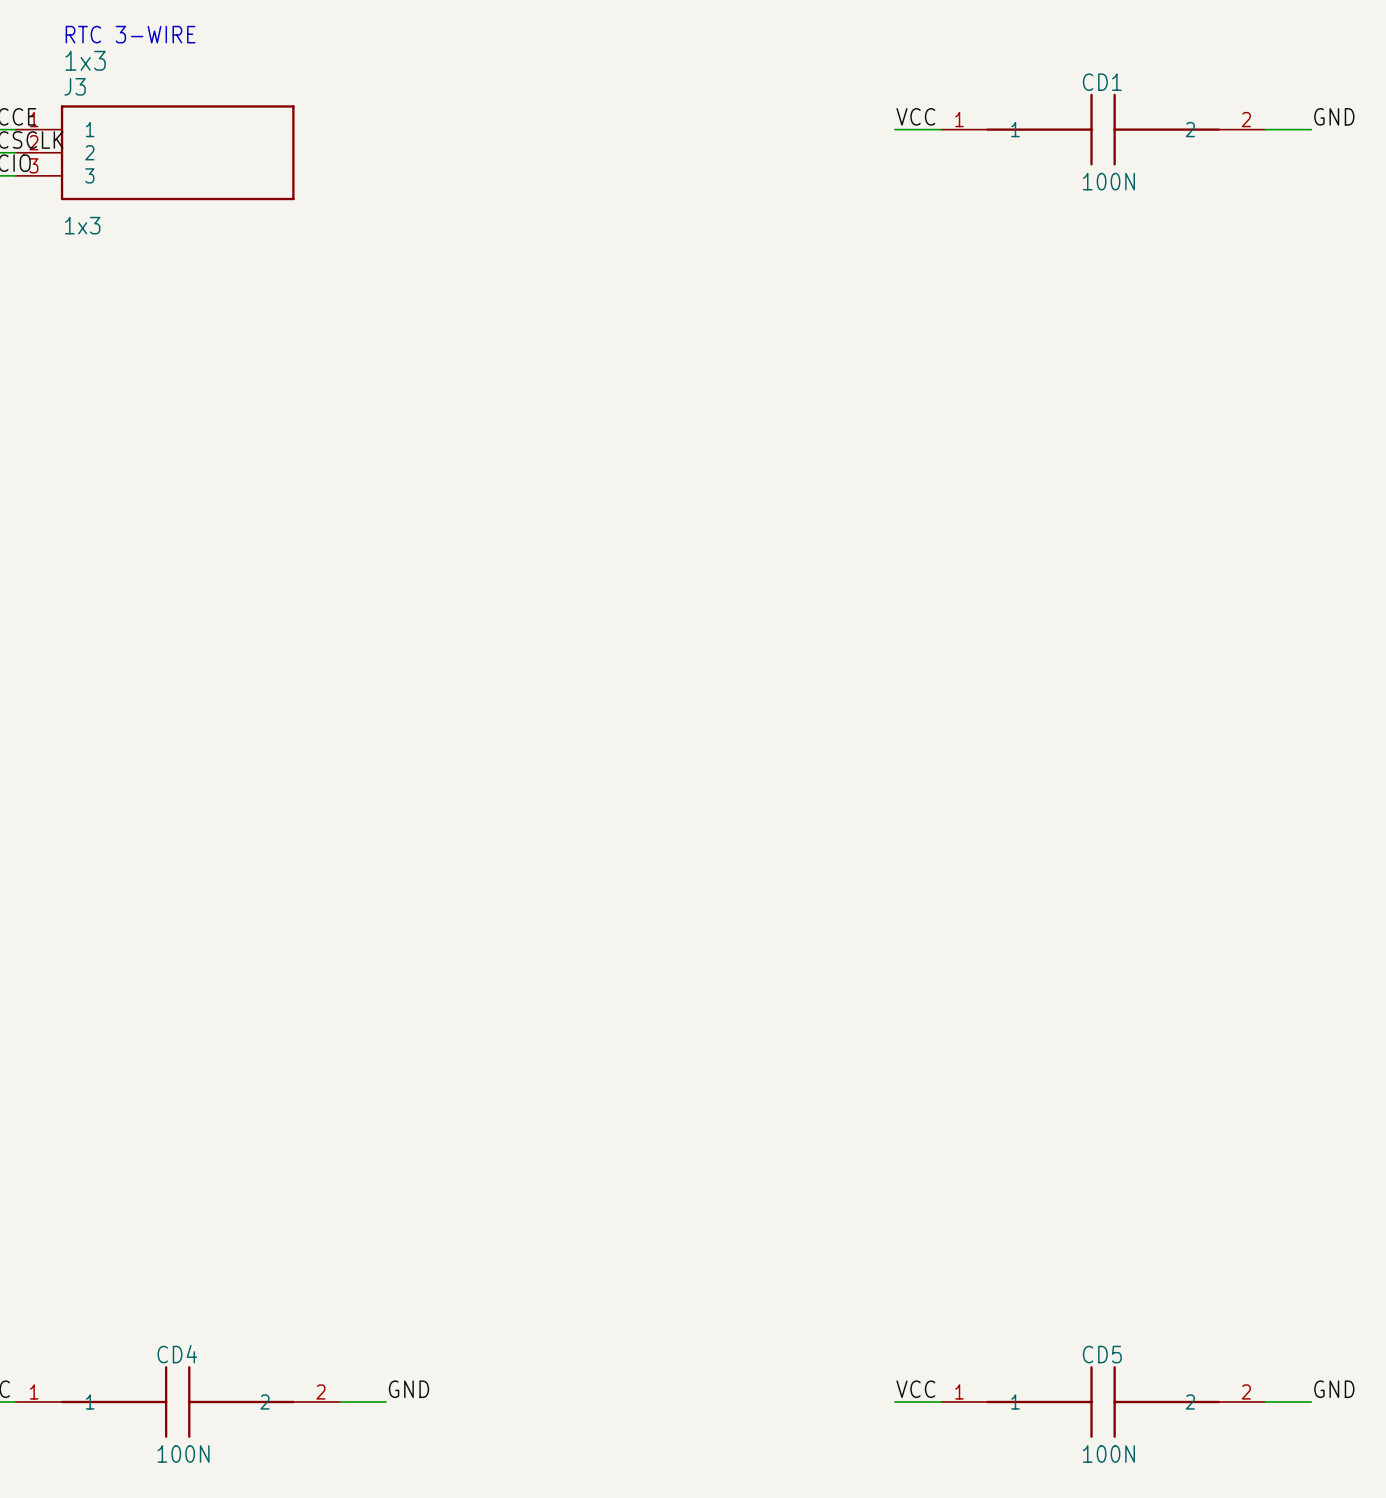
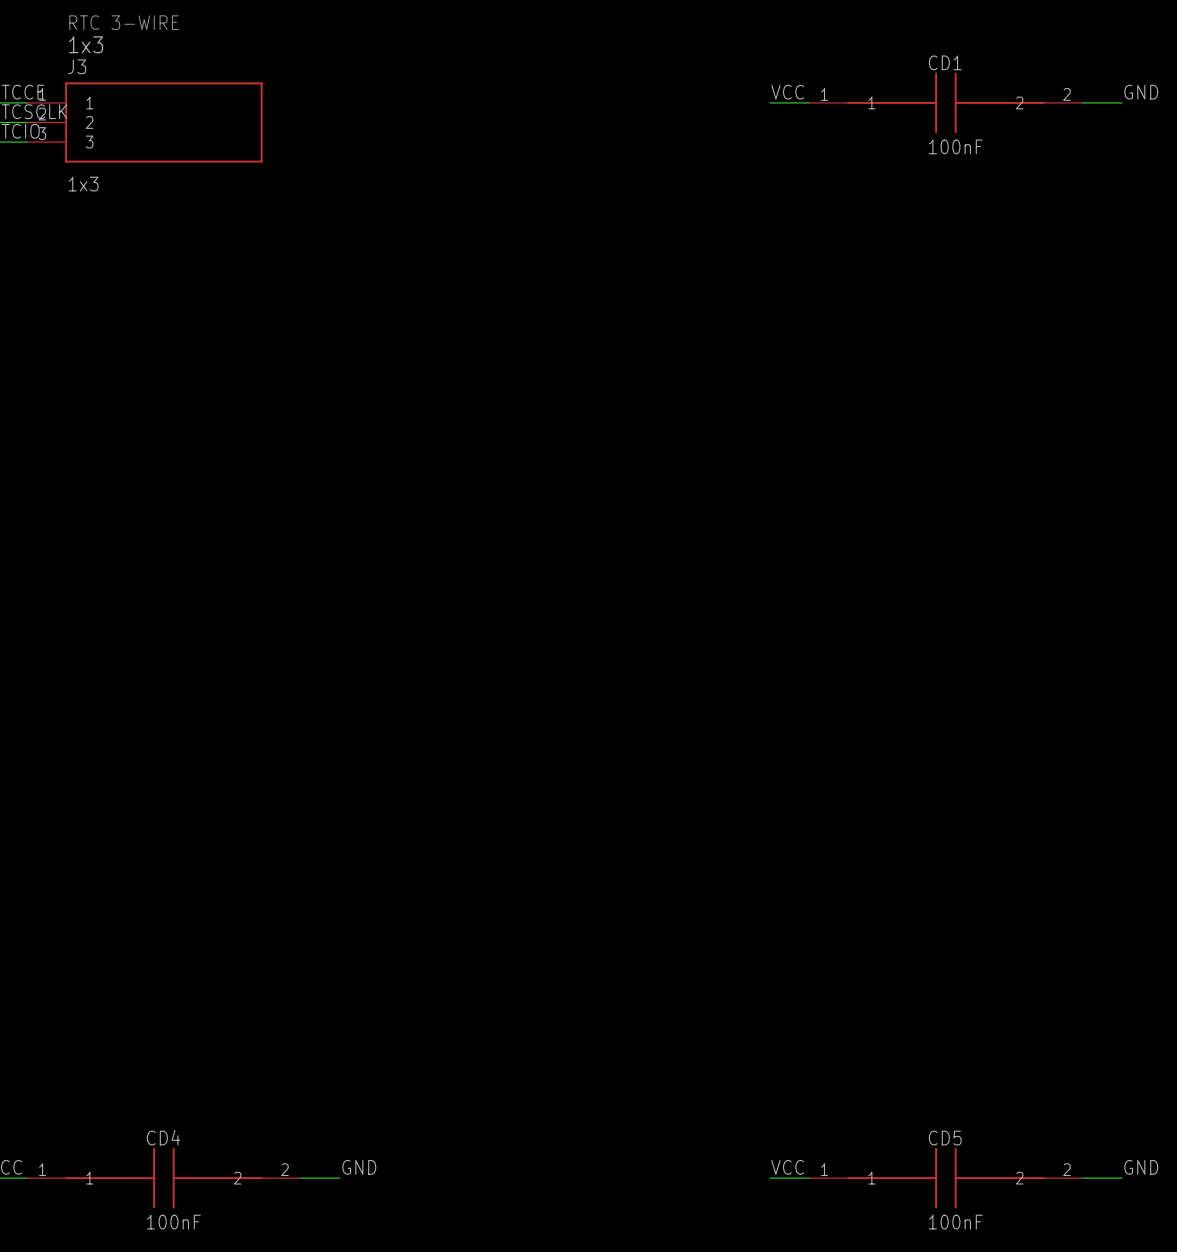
CD1 value: 100N (1108, 181) -> 100nF (955, 146)
CD4 value: 100N (183, 1454) -> 100nF (173, 1222)
CD5 value: 100N (1108, 1454) -> 100nF (955, 1222)

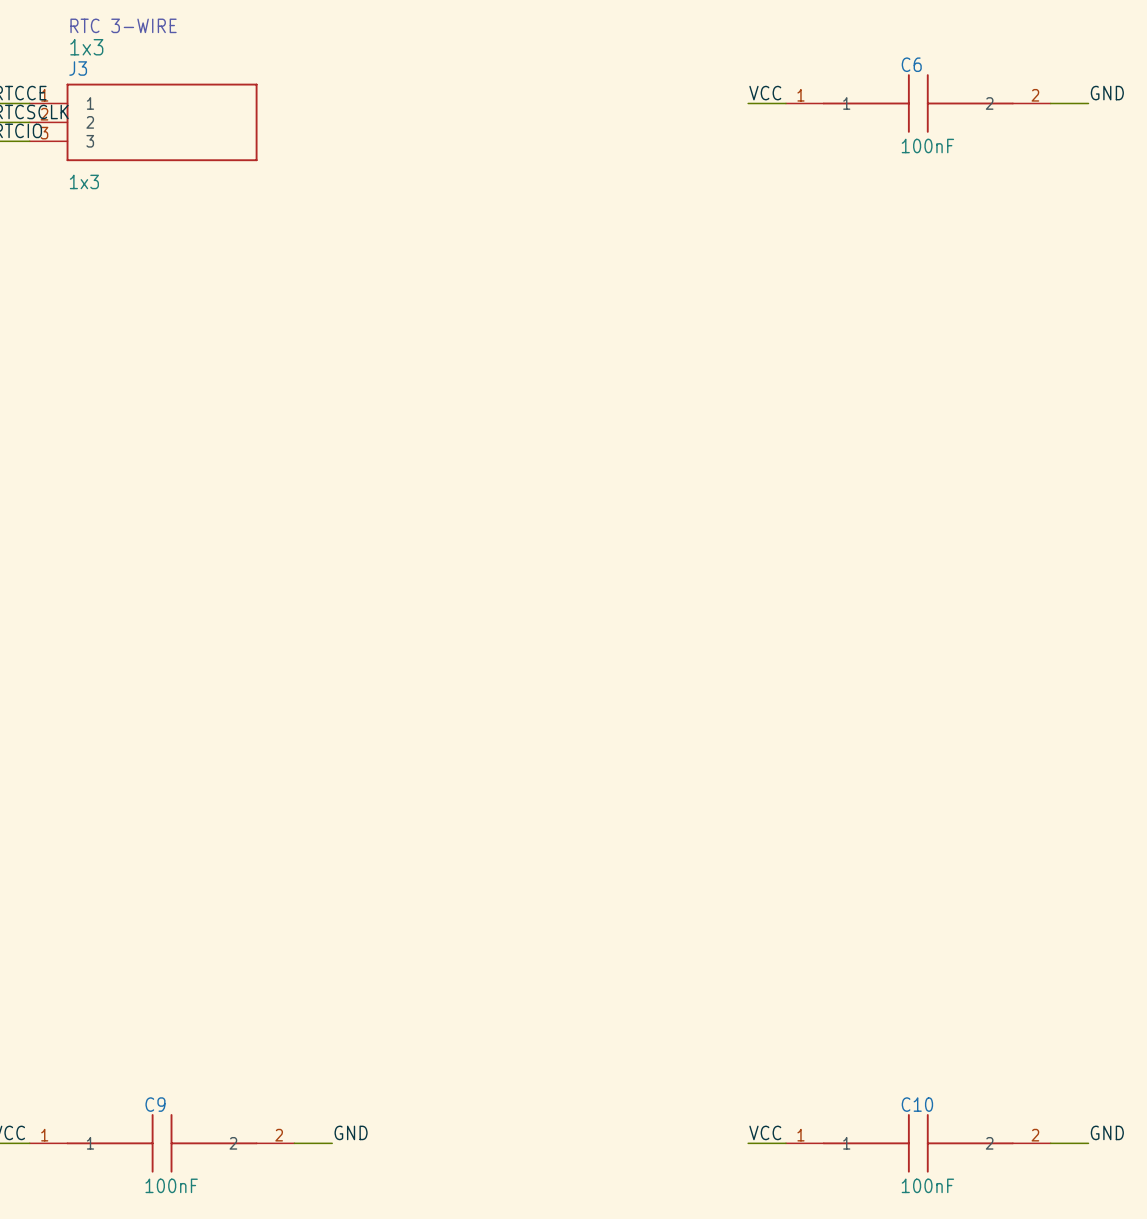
CD1 name: CD1 (945, 62) -> C6 (911, 64)
CD4 name: CD4 (163, 1137) -> C9 (155, 1104)
CD5 name: CD5 (945, 1138) -> C10 (917, 1104)

